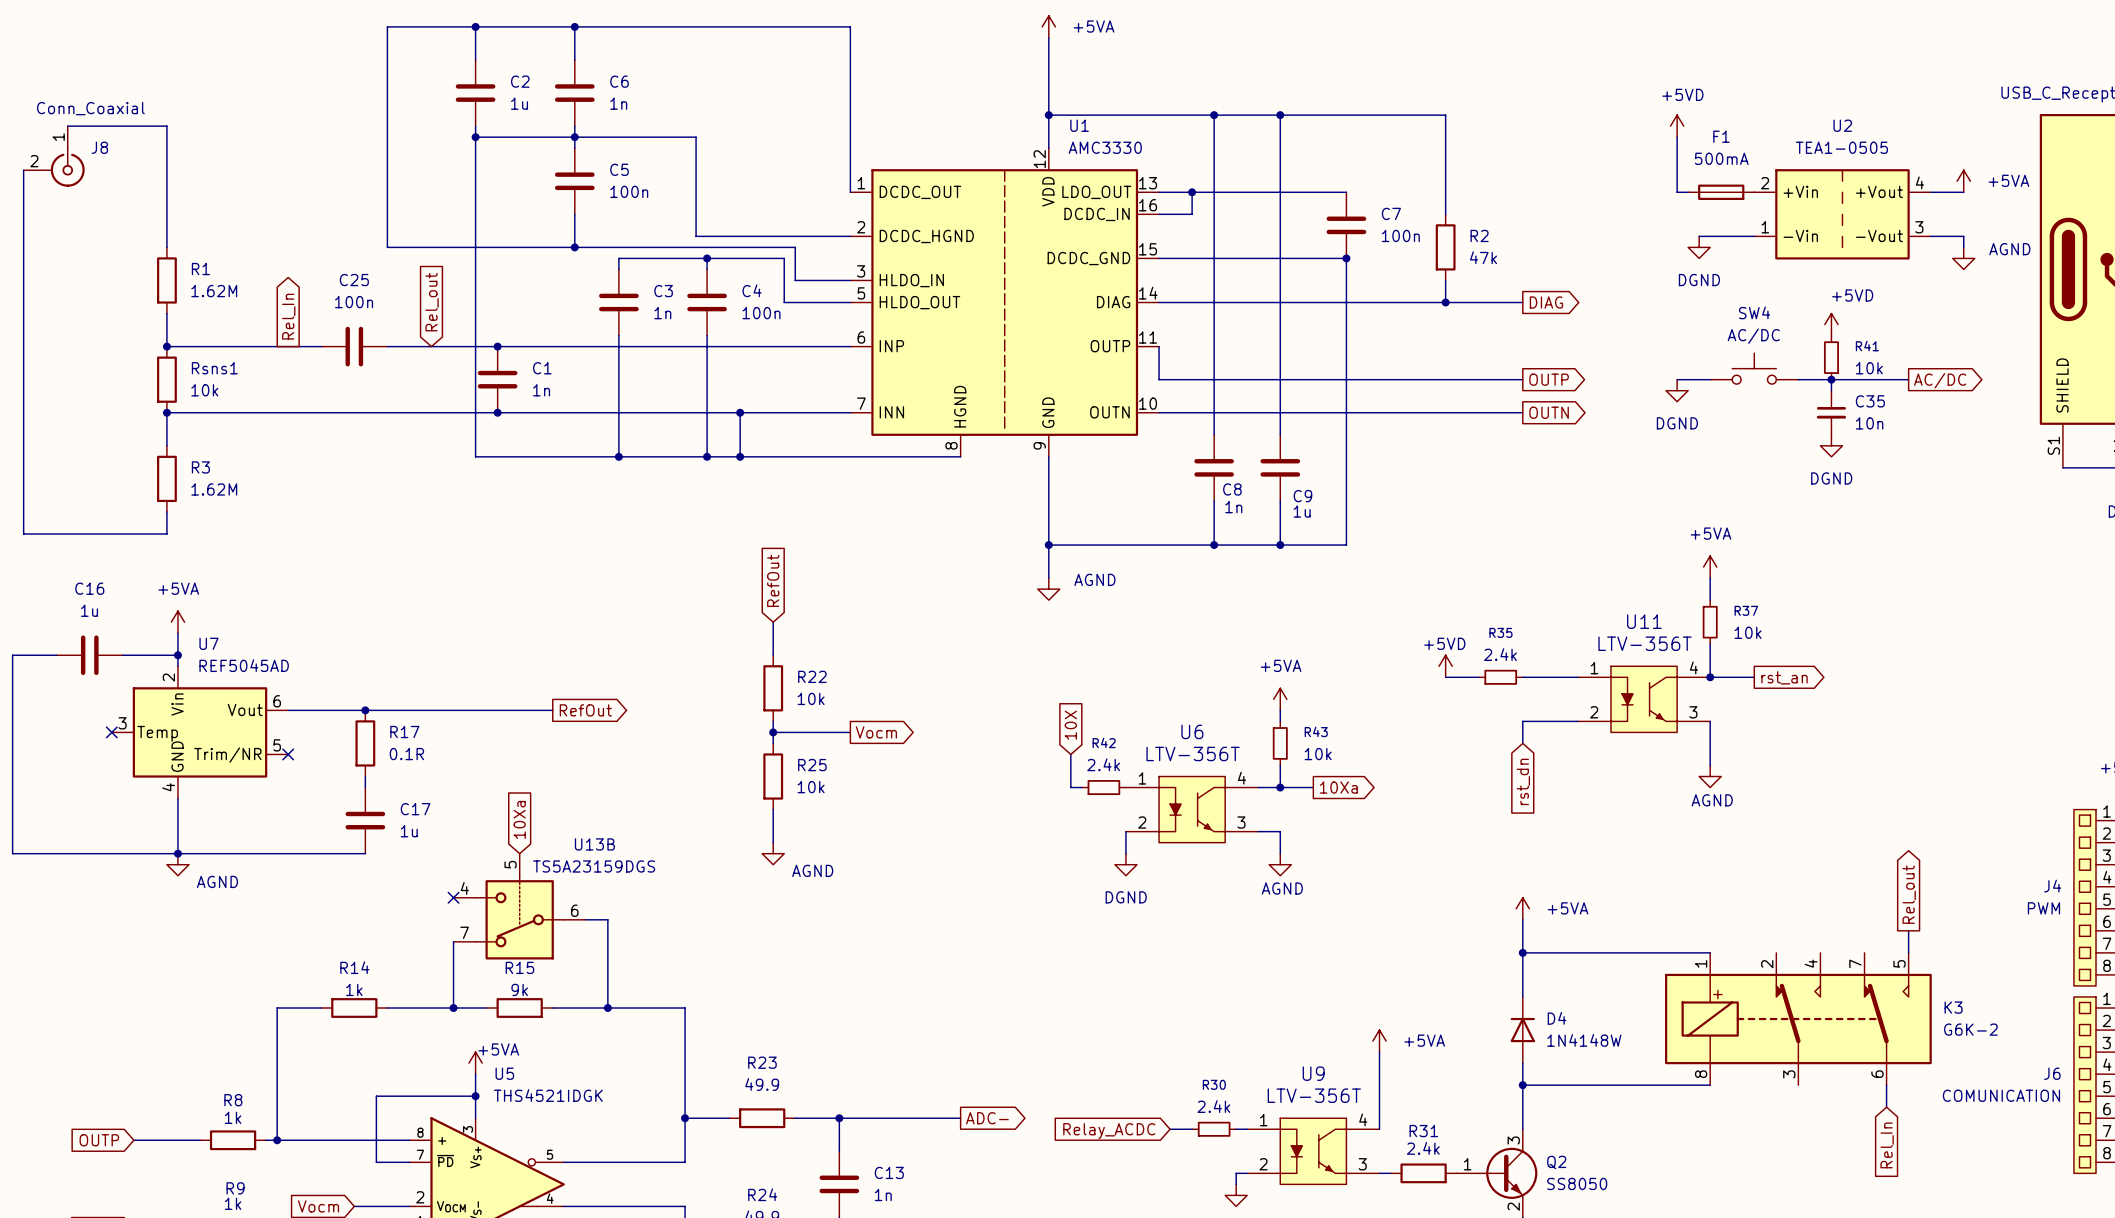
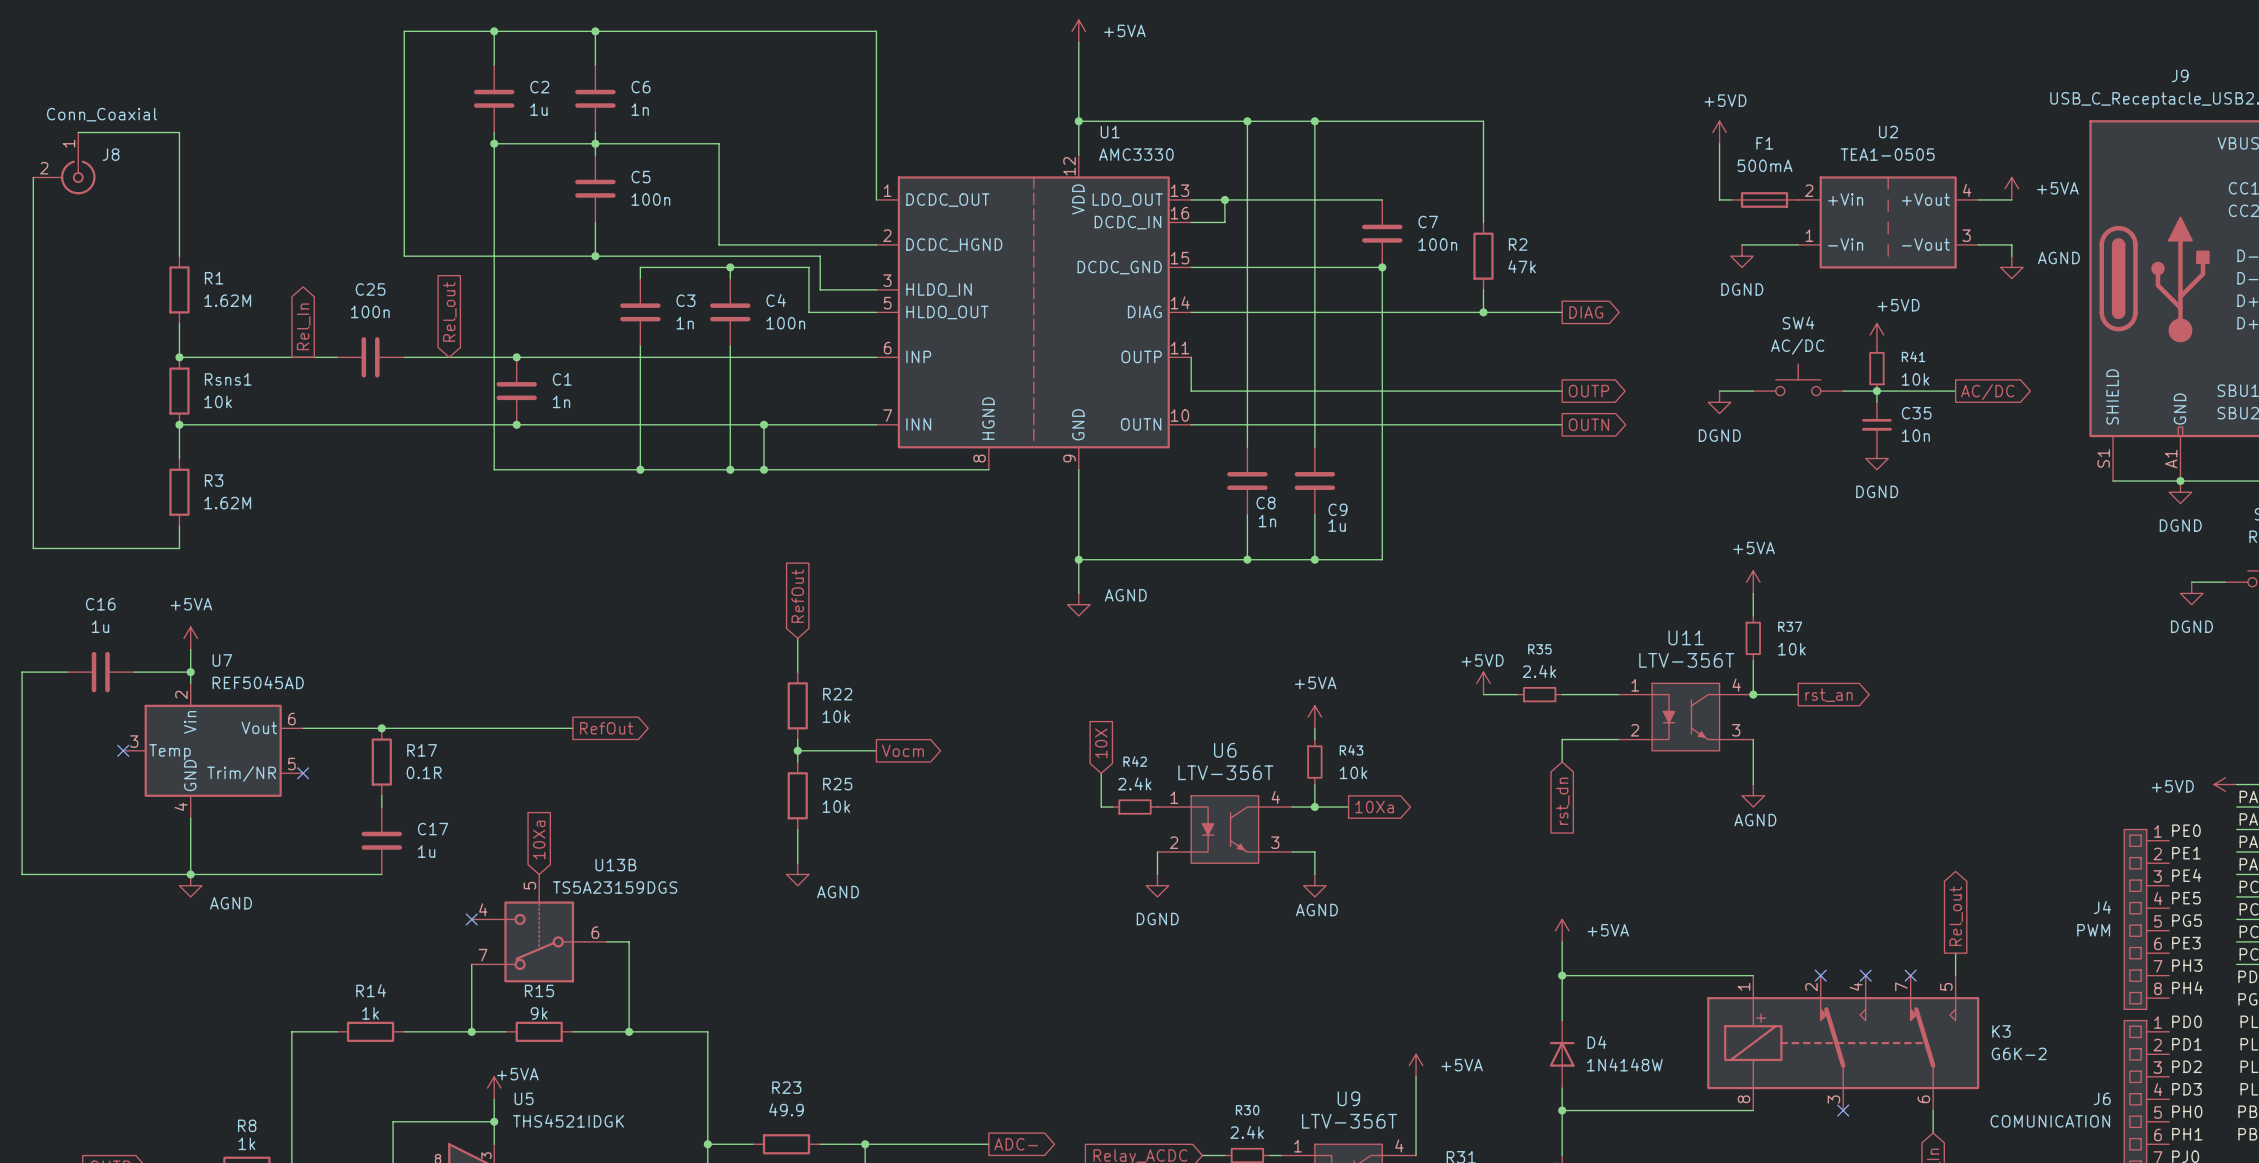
no-connect mark: none -> (1820, 975)
no-connect mark: none -> (1865, 975)
no-connect mark: none -> (1910, 975)
no-connect mark: none -> (1843, 1110)

